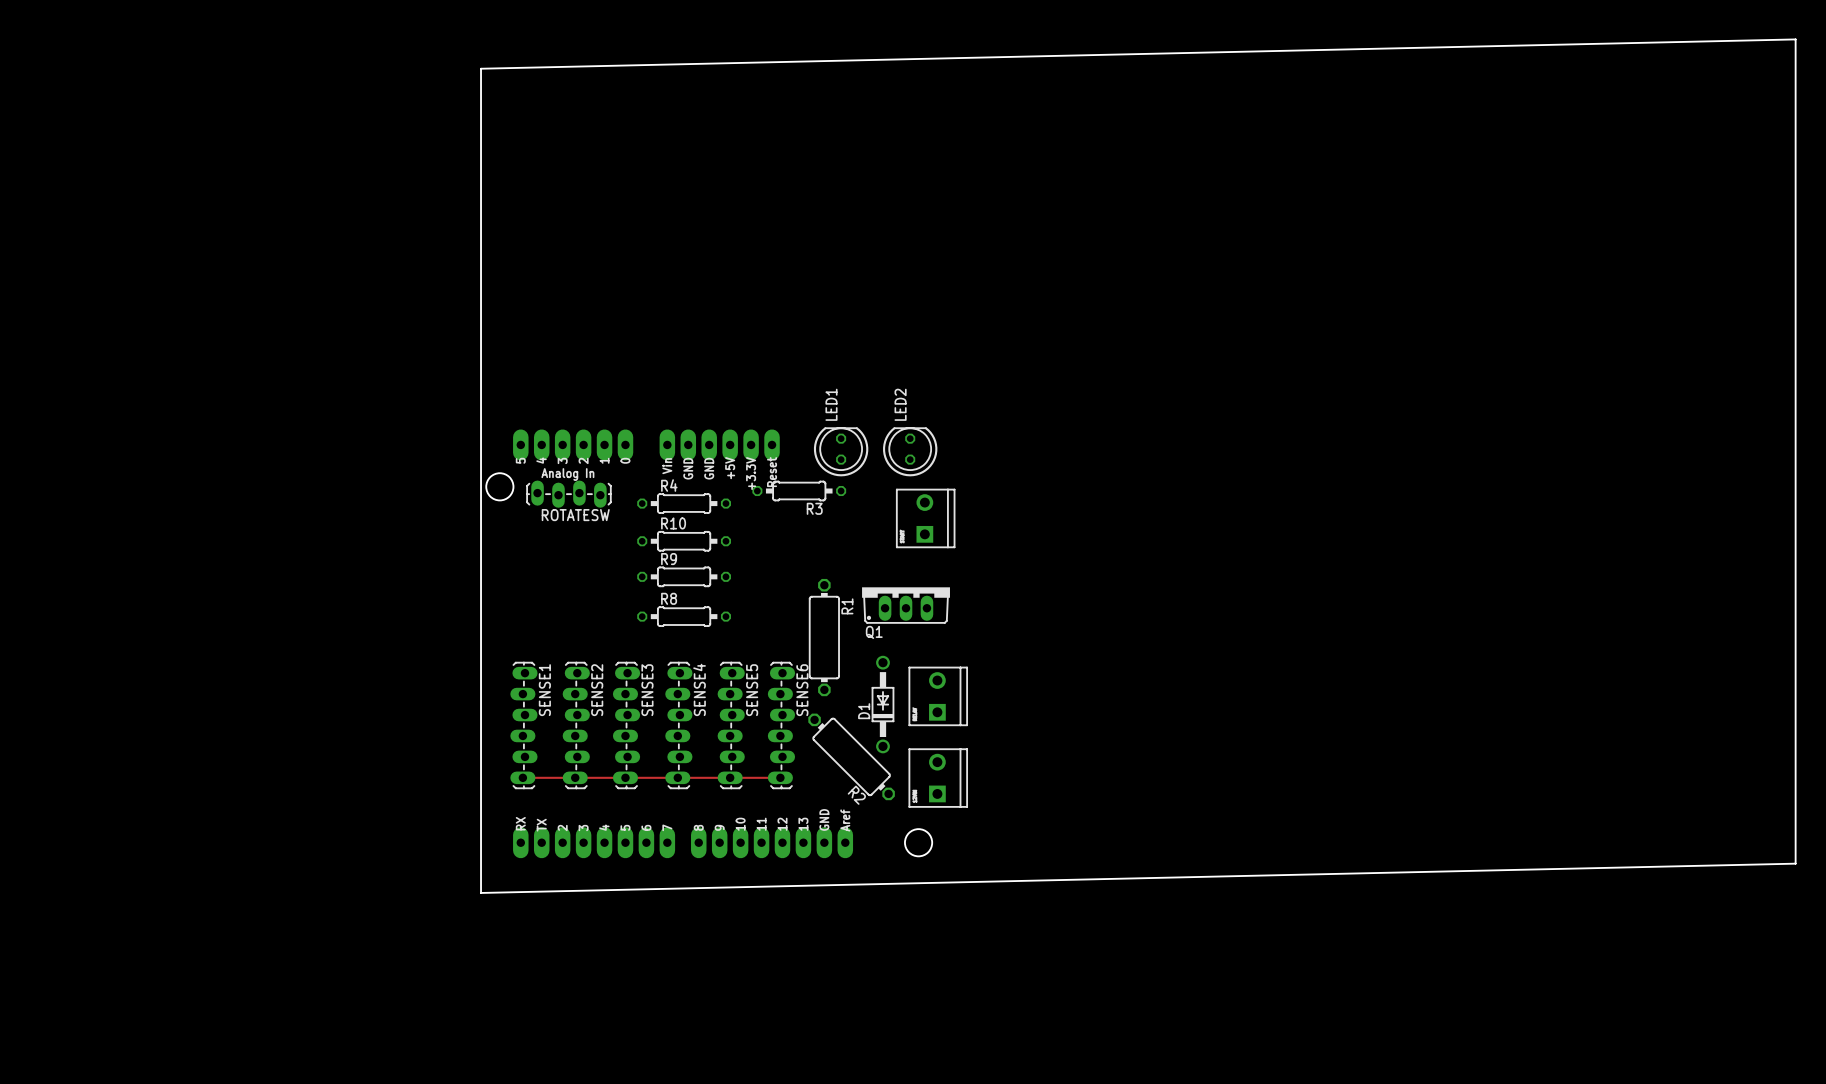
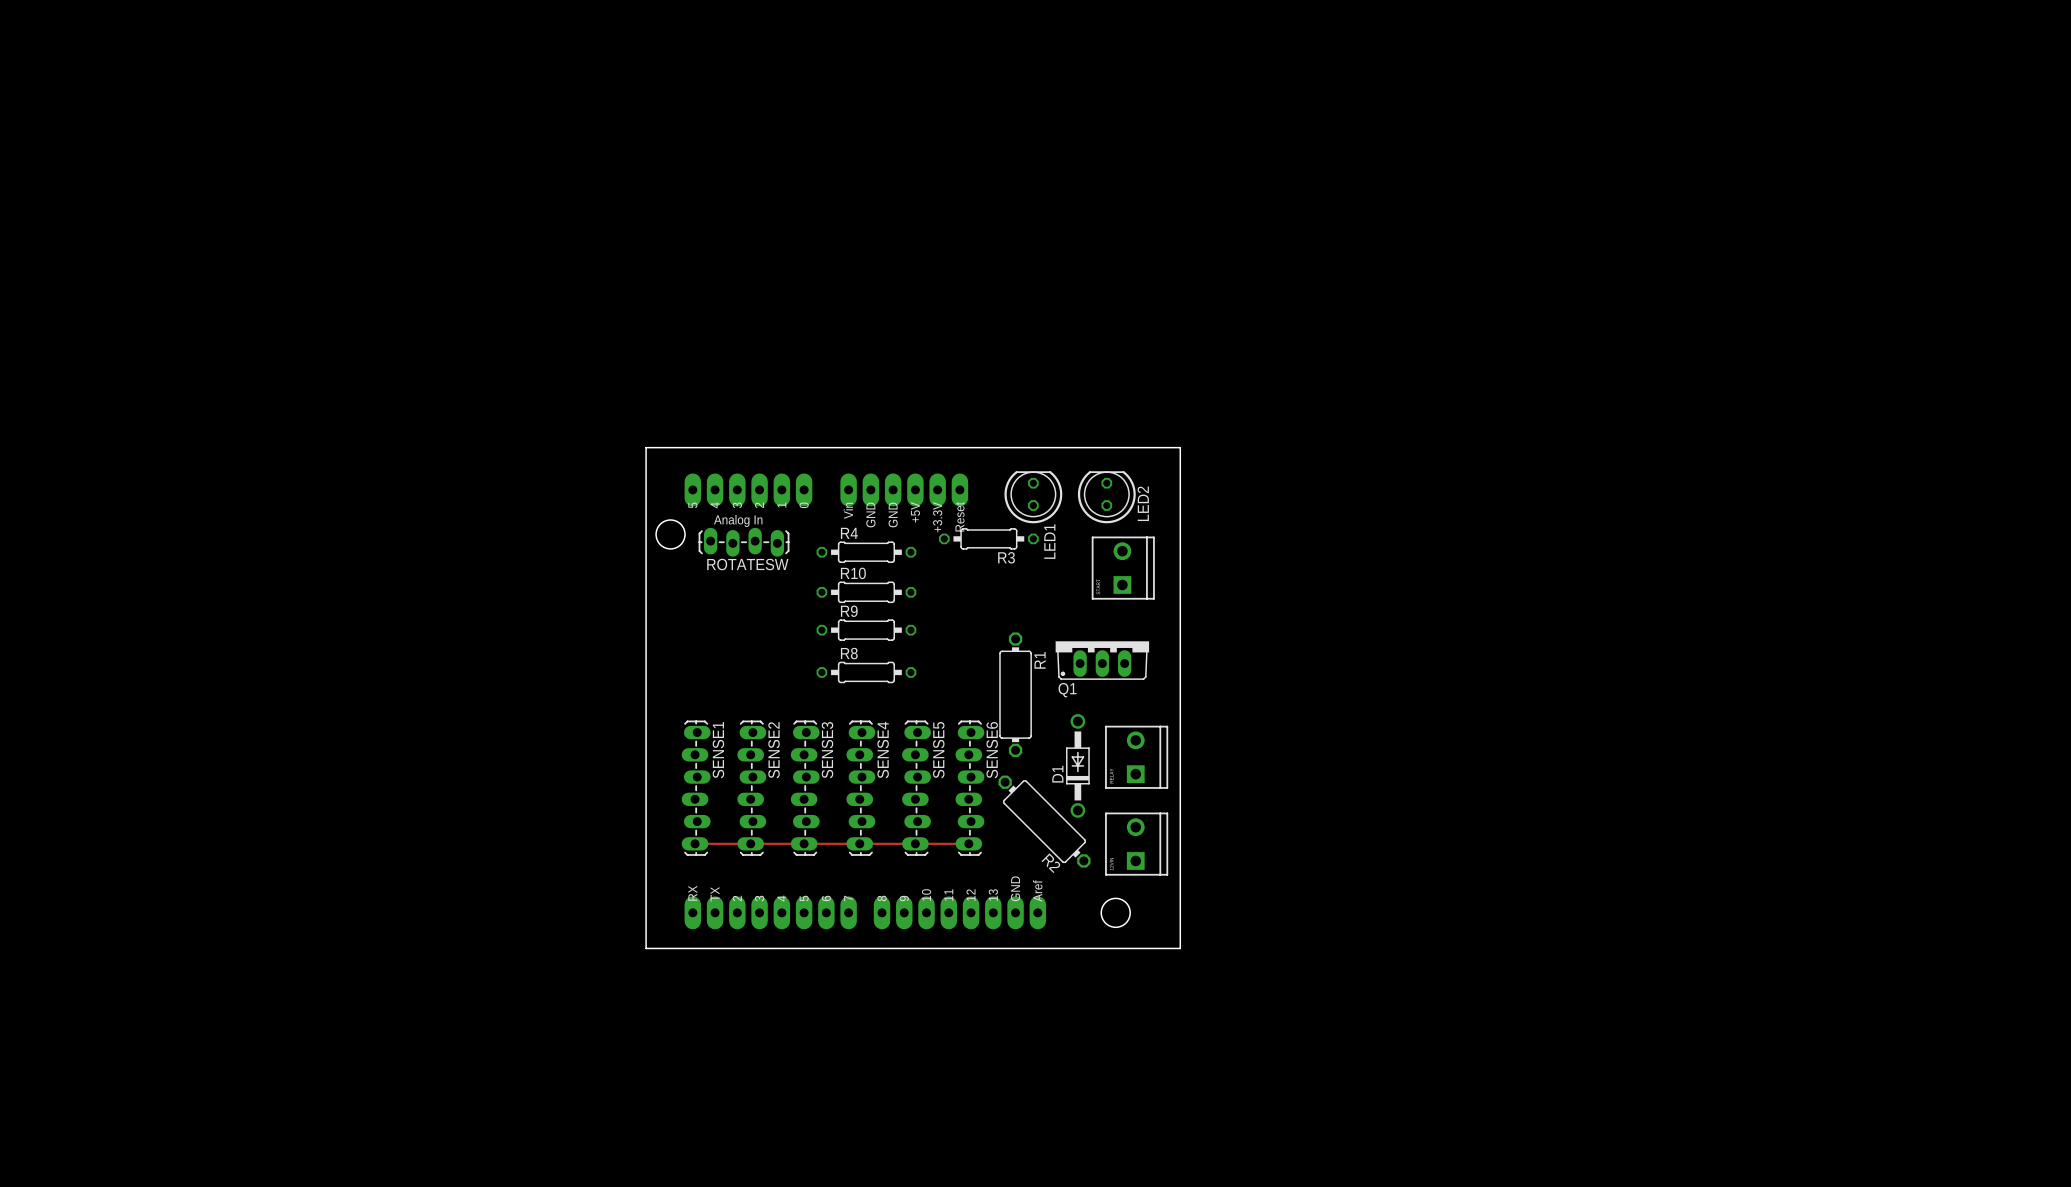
board edge: (1795, 39) (1795, 863) (481, 892) (481, 68) (1795, 39) -> none
LED1 name position: LED1 (831, 404) -> LED1 (1049, 541)
LED2 name position: LED2 (900, 404) -> LED2 (1143, 503)
board edge: none -> (646, 447) (1180, 447) (1180, 948) (646, 948) (646, 447)

